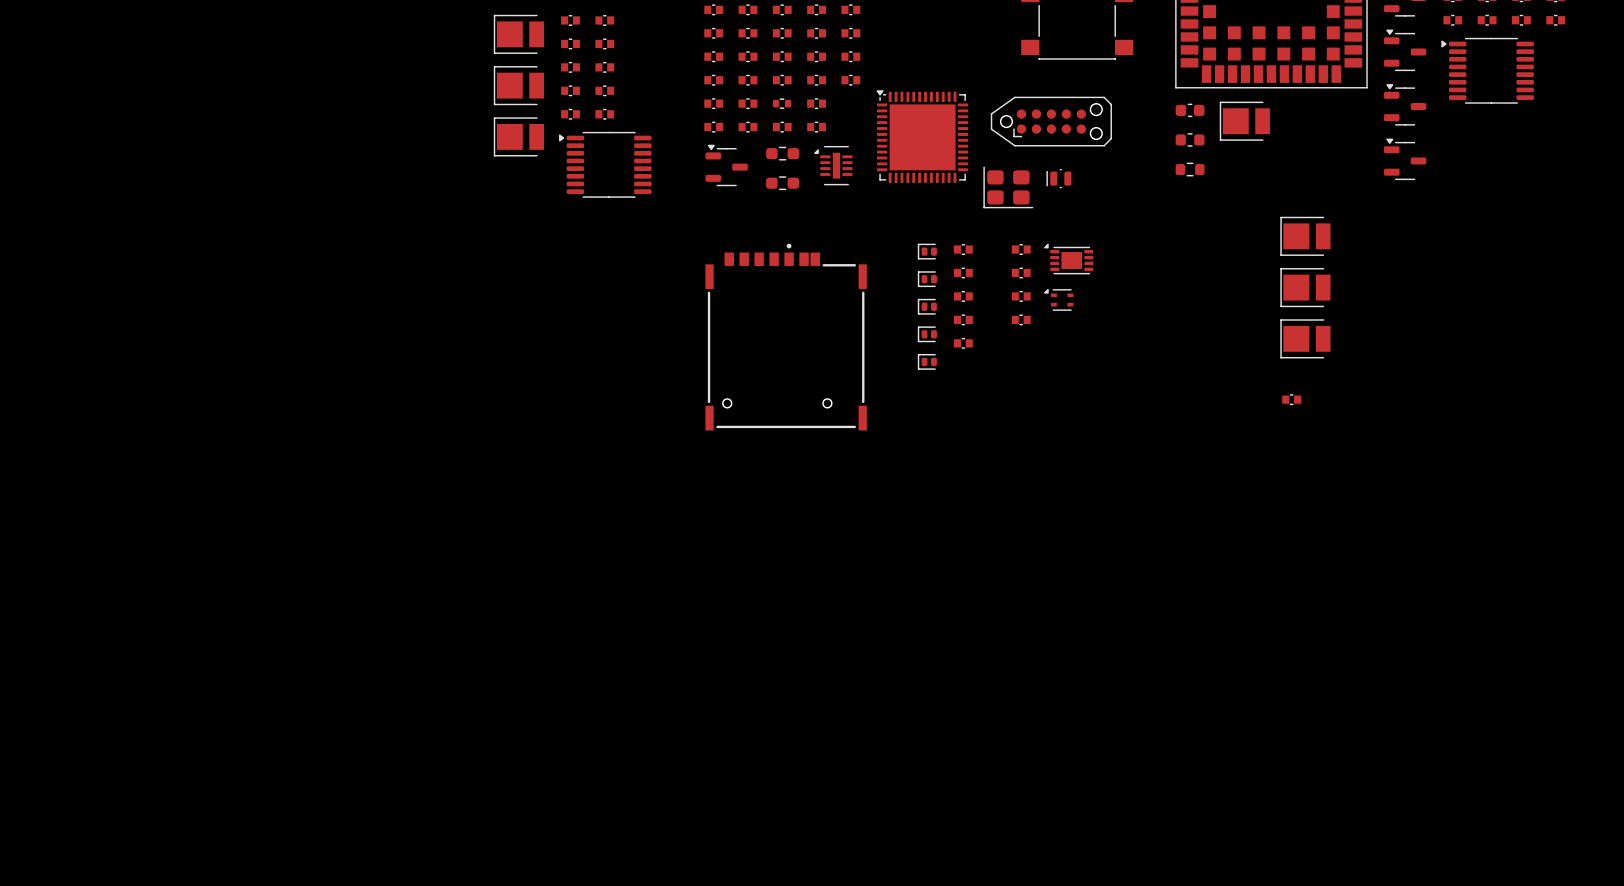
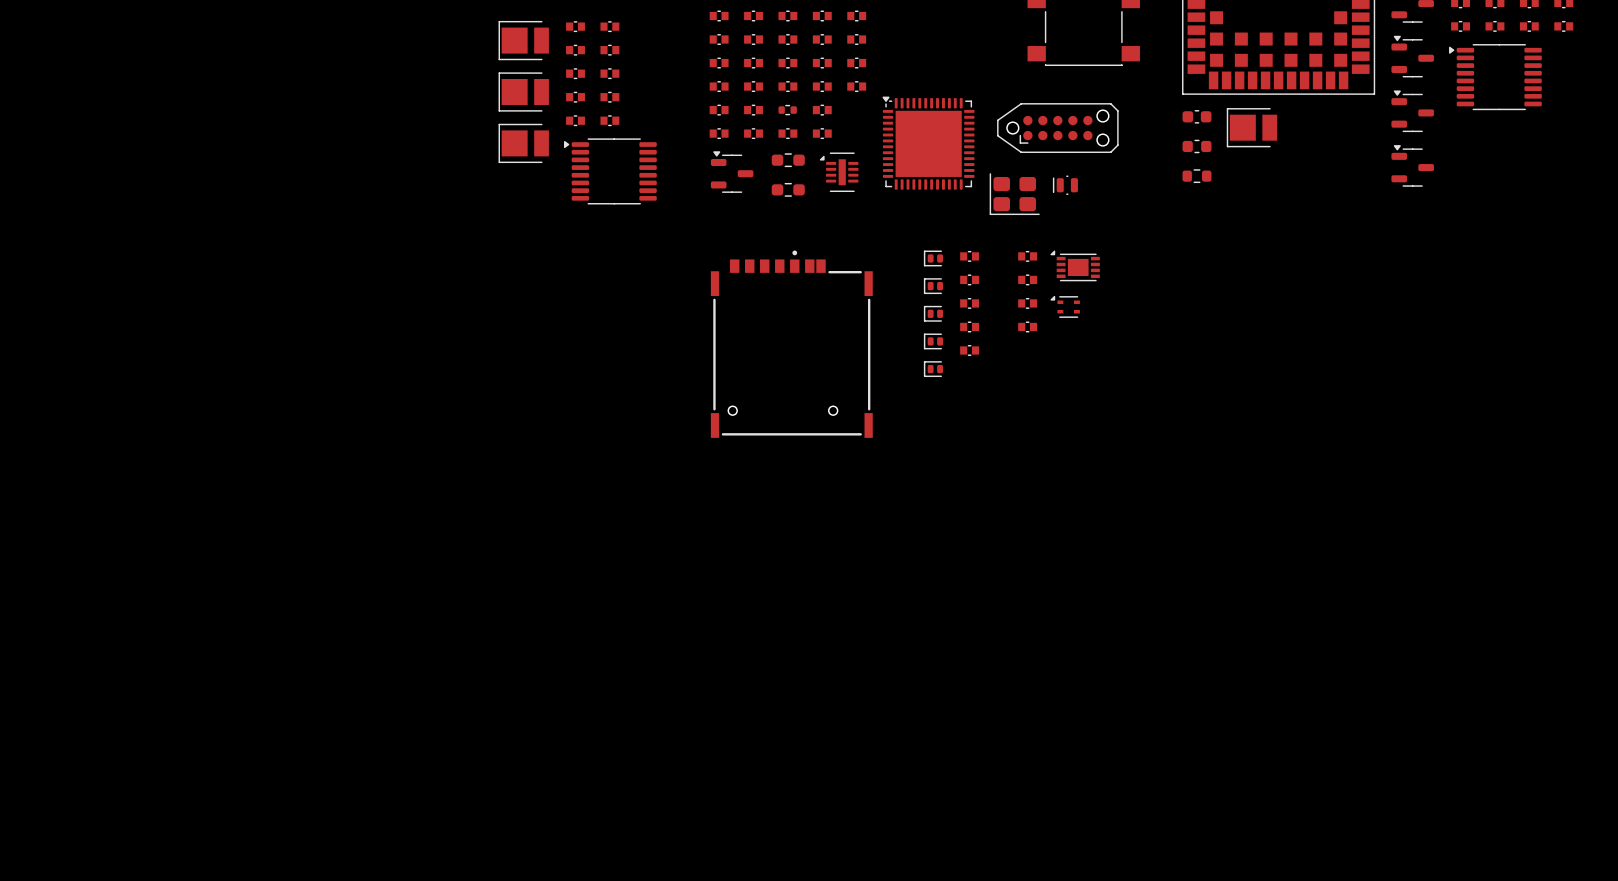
part: (1305, 236) -> none
part: (1305, 287) -> none
part: (1305, 338) -> none
part: (1291, 399) -> none

